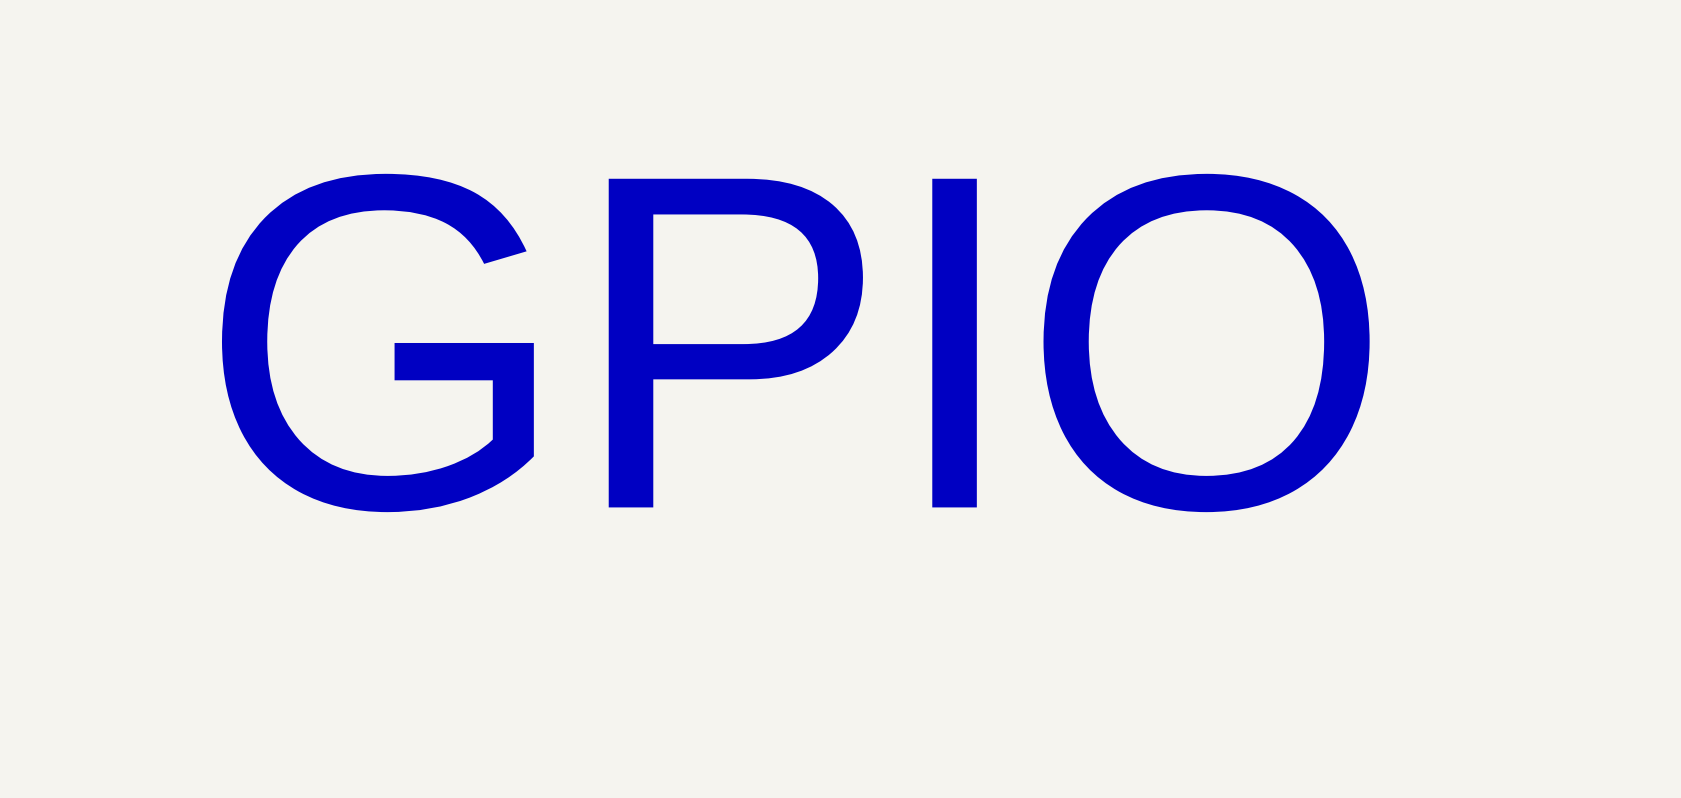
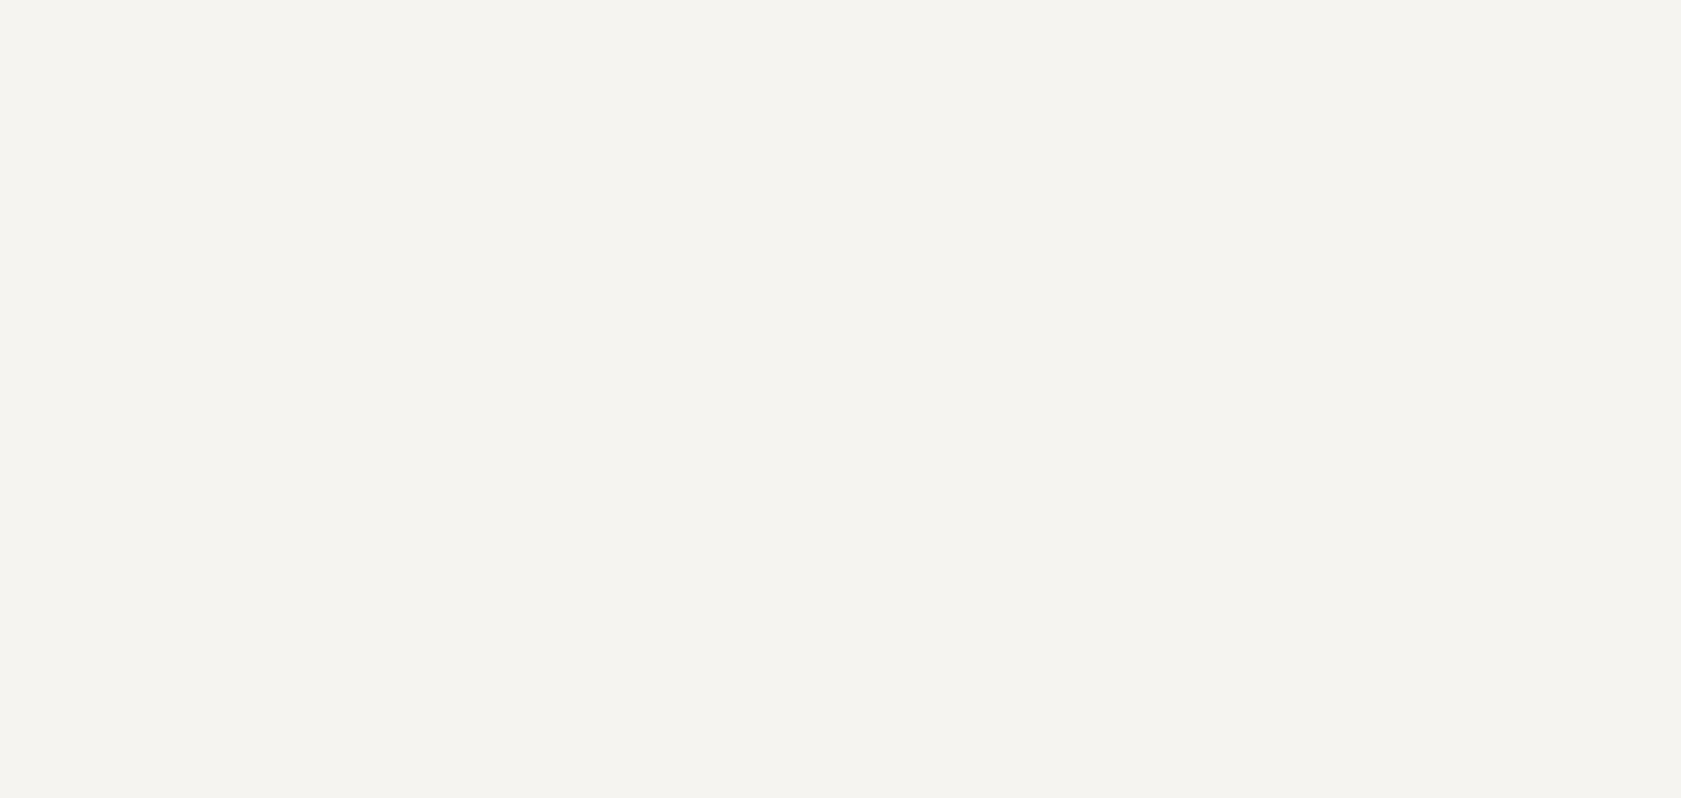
text: GPIO (795, 342) -> none

